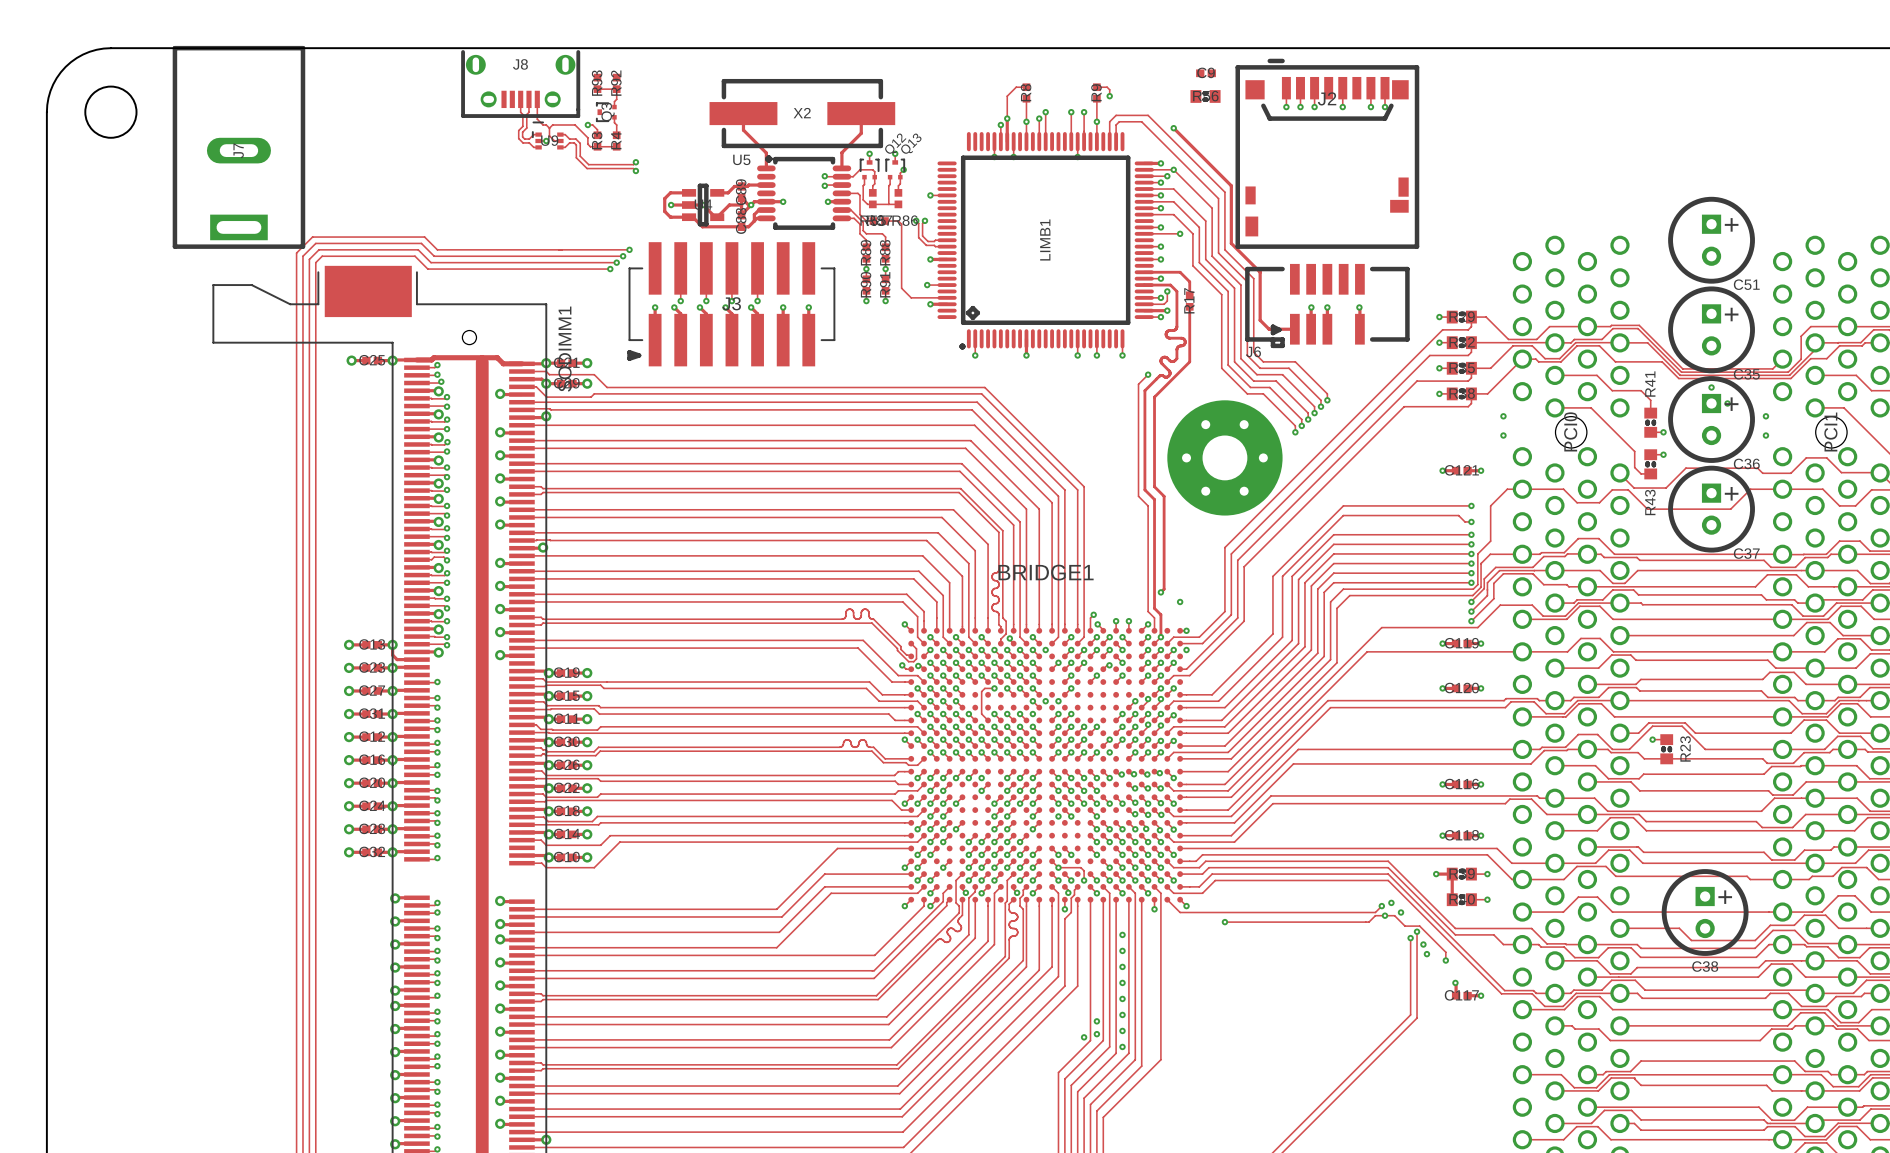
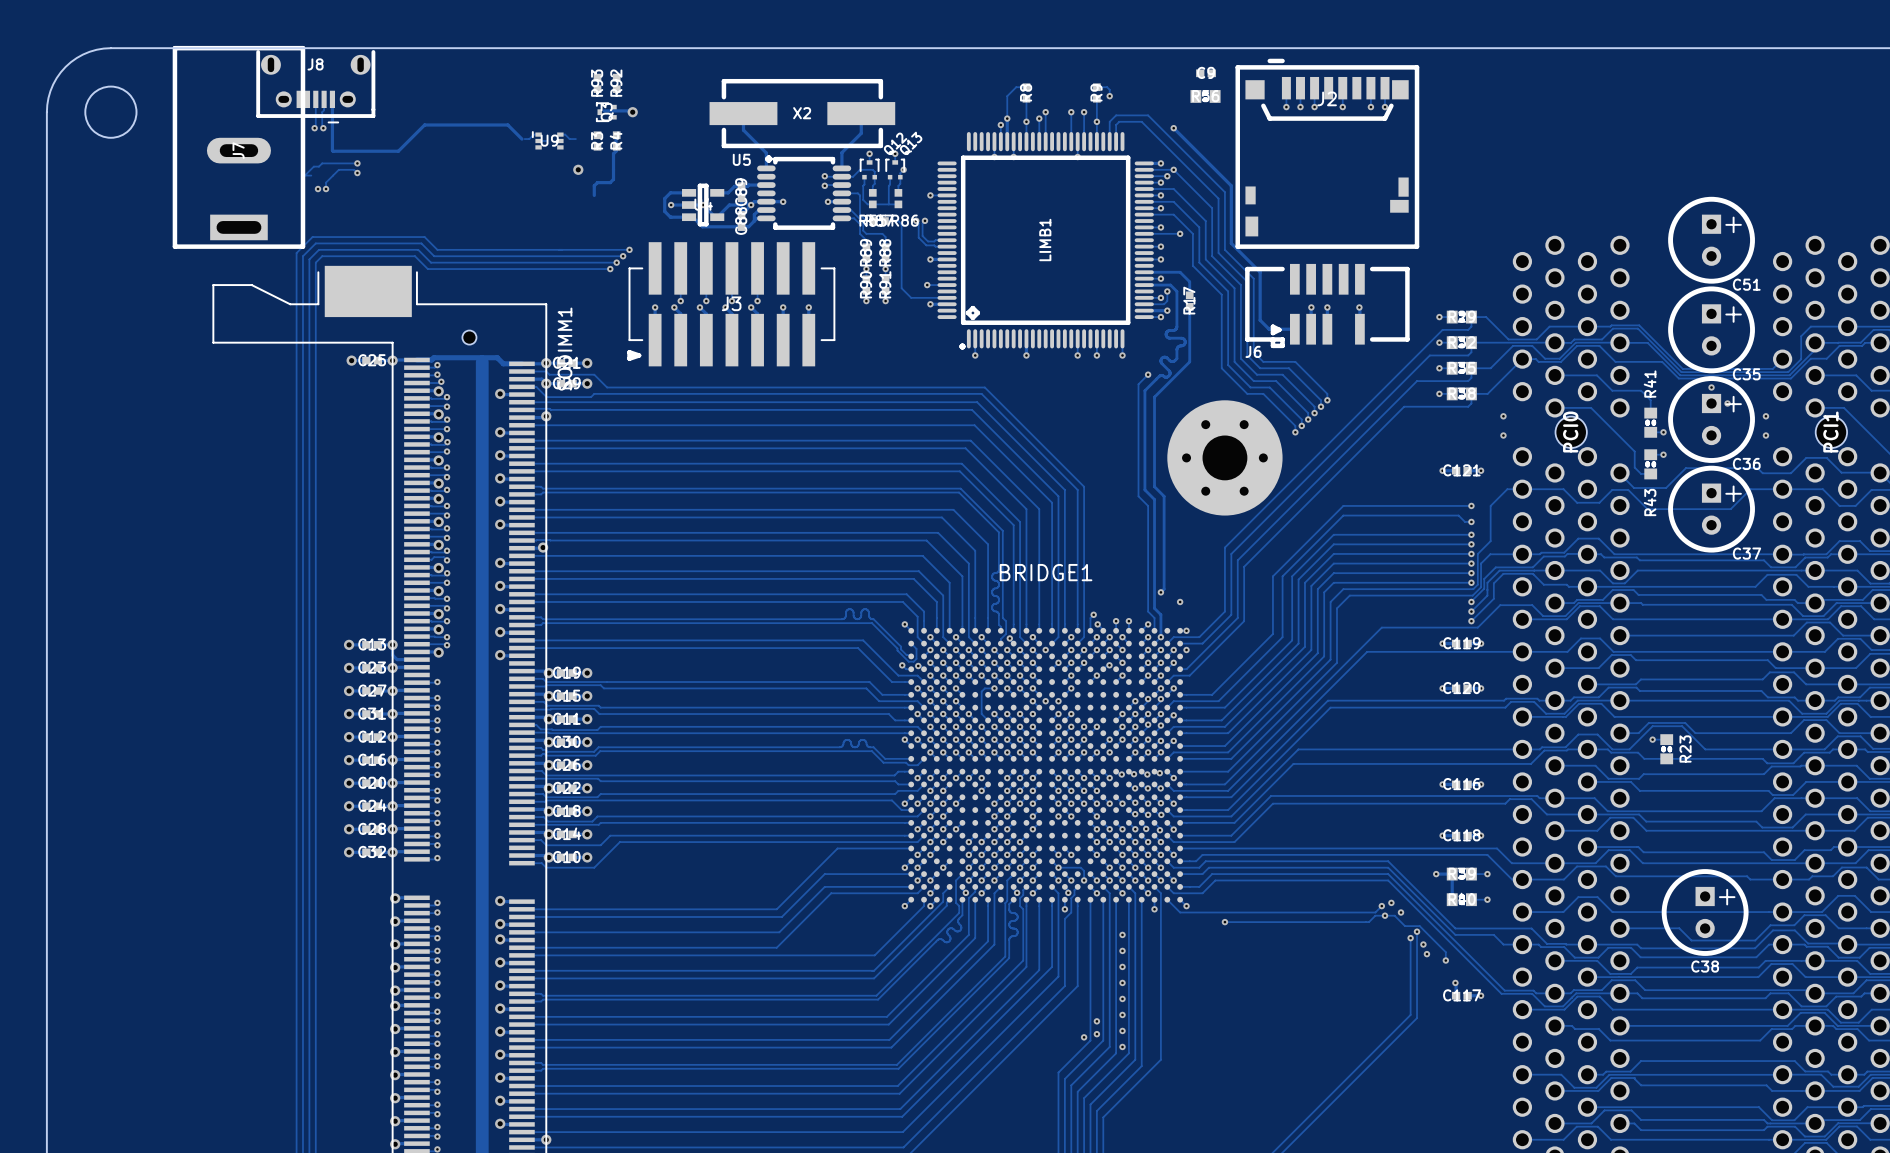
J8 position: (520, 86) -> (315, 86)
track: (597, 89) (616, 89) (614, 107) -> none
track: none -> (315, 99) (314, 128)
track: none -> (324, 99) (324, 110) (322, 112) (323, 128)
track: none -> (332, 99) (333, 151) (398, 151) (424, 124) (507, 124) (521, 139)
track: (520, 99) (522, 126) (518, 130) (518, 138) (523, 142) (529, 142) (533, 147) (538, 147) -> none
track: (528, 99) (526, 128) (522, 132) (524, 139) -> none
track: (537, 99) (537, 119) (549, 128) -> none
track: none -> (603, 110) (632, 112)
via: none -> (632, 112)
track: (614, 117) (616, 135) -> none
track: (587, 124) (592, 124) (597, 129) (597, 135) -> none
via: (587, 124) -> none
via: none -> (314, 128)
via: none -> (323, 128)
track: (549, 128) (552, 124) (575, 124) (587, 137) (587, 144) (590, 146) (616, 146) -> none
track: (549, 128) (549, 135) (554, 141) (560, 141) -> none
track: (575, 139) (580, 143) (580, 156) (588, 164) (633, 164) (635, 162) -> none
track: none -> (616, 139) (616, 151) (613, 153) (613, 179) (610, 182) (597, 182) (594, 185) (594, 195)
via: (546, 141) -> none
track: (560, 147) (574, 142) (576, 145) (576, 157) (587, 168) (633, 168) (635, 170) -> none
via: (635, 162) -> none
track: none -> (357, 163) (322, 163) (318, 166) (313, 166) (304, 175) (311, 175)
via: none -> (357, 163)
via: none -> (578, 169)
via: (635, 170) -> none
track: none -> (357, 173) (354, 169) (338, 169) (326, 182) (326, 189)
via: none -> (357, 173)
via: none -> (318, 189)
via: none -> (326, 189)

